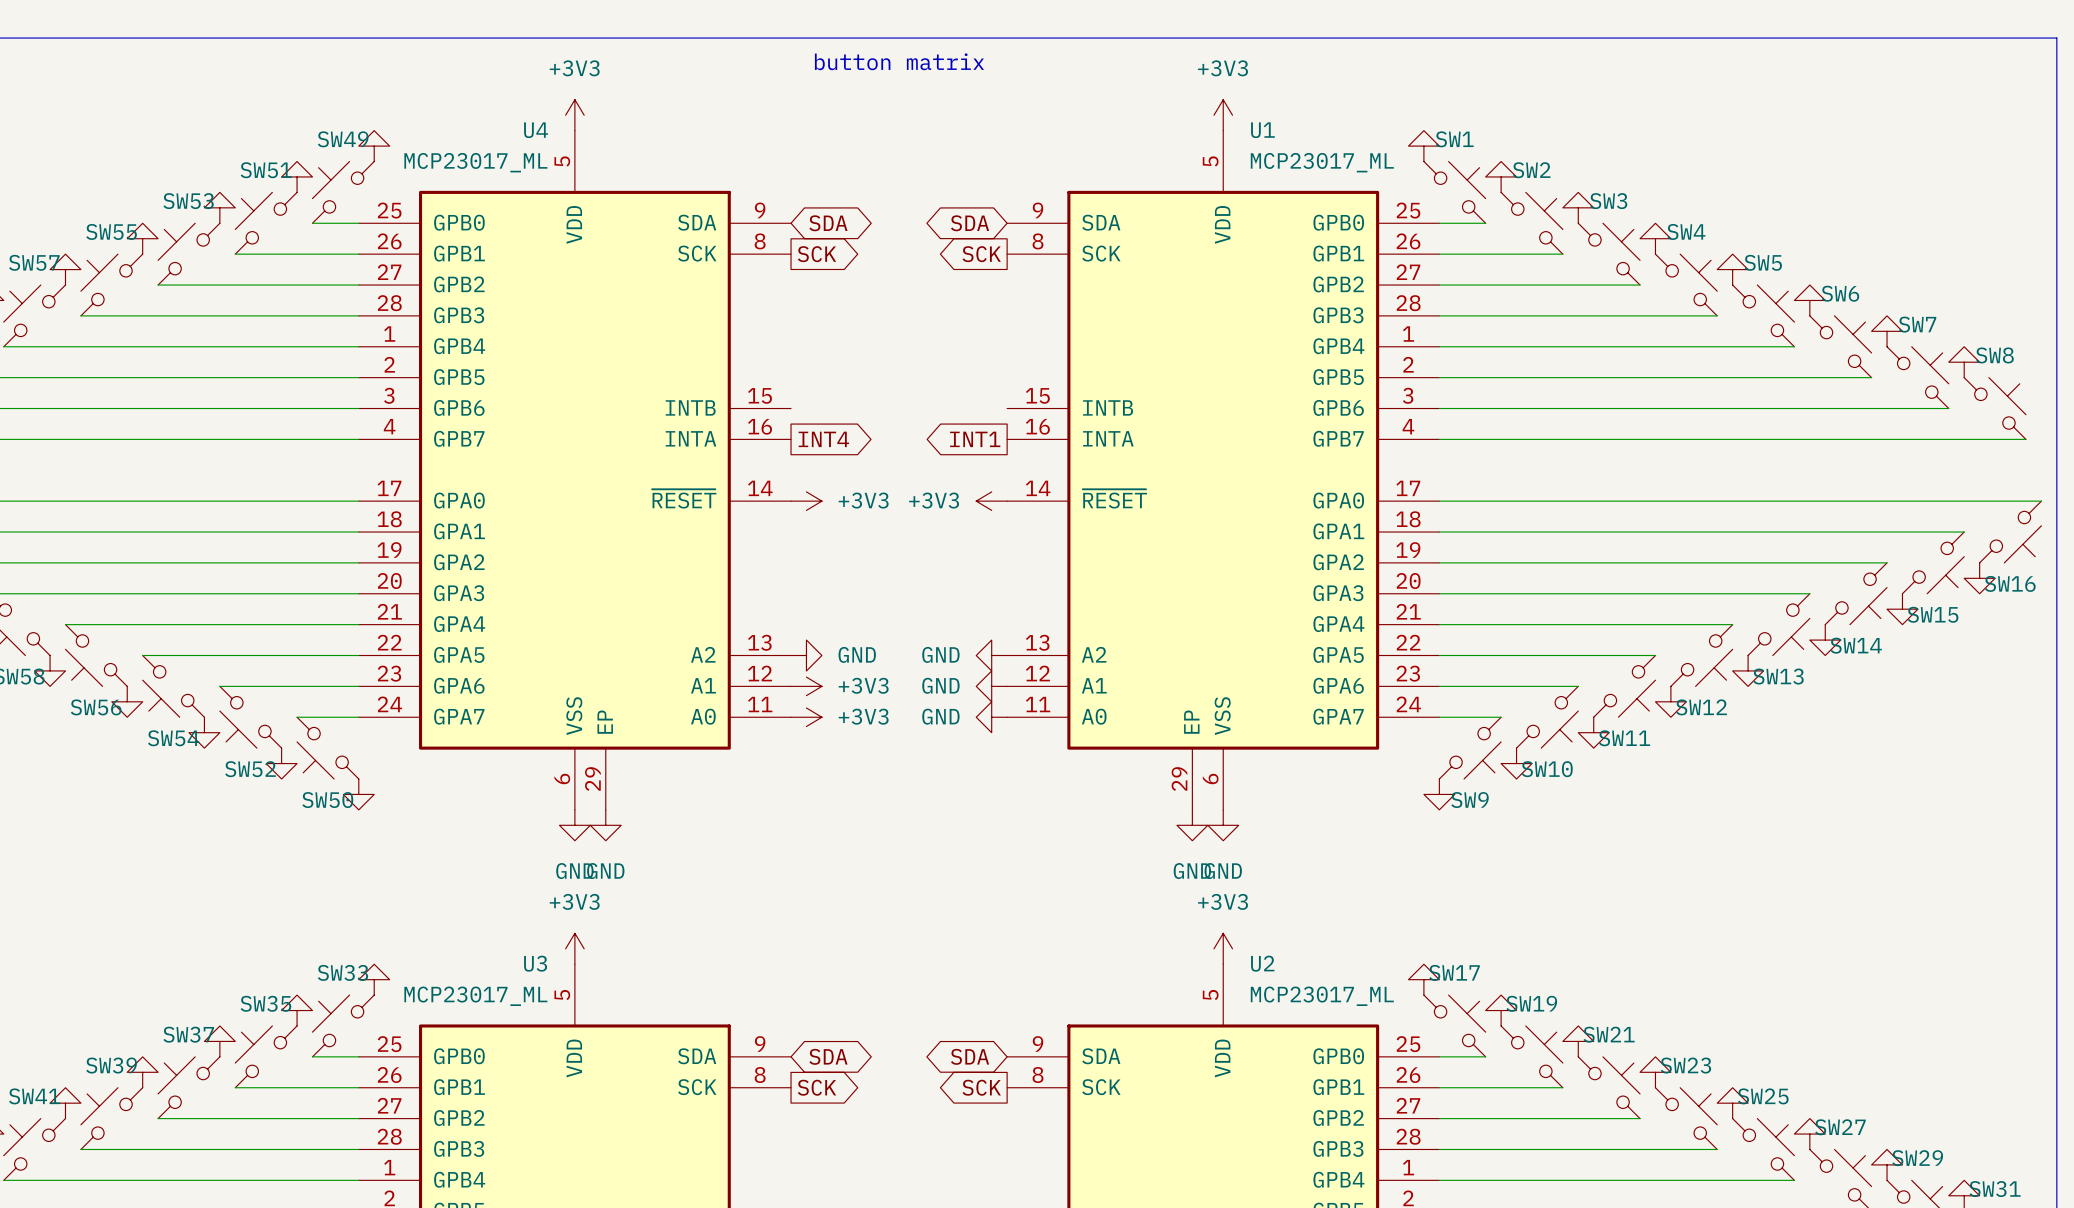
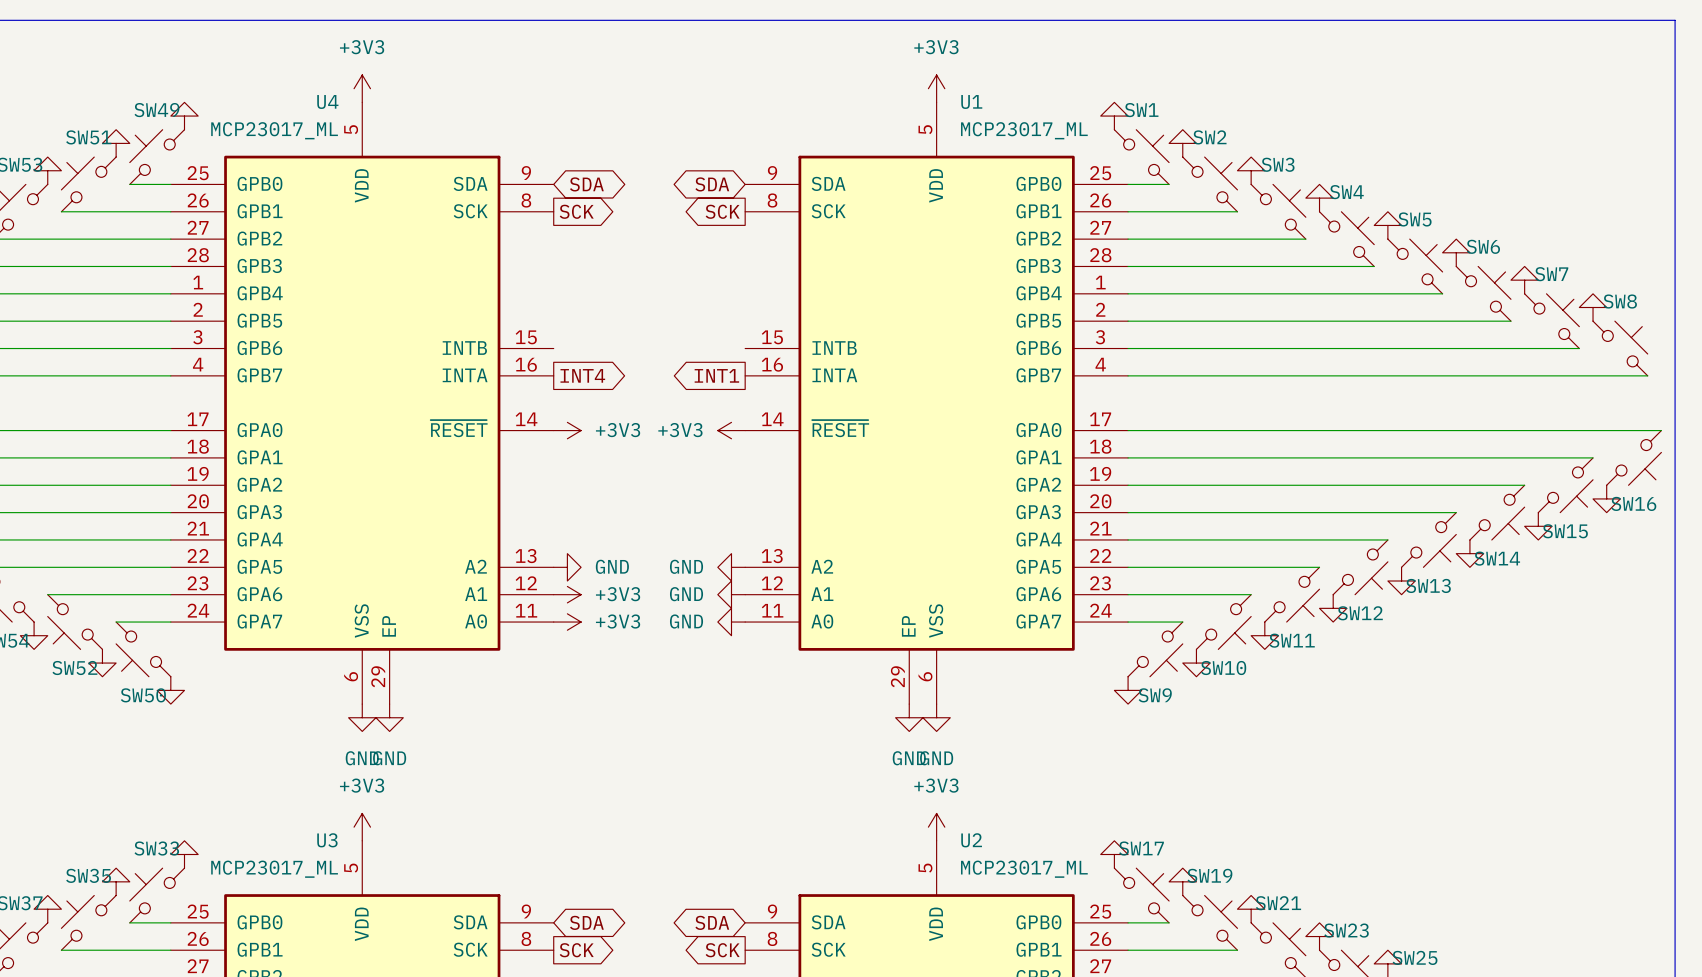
text: button matrix (899, 61) -> none

